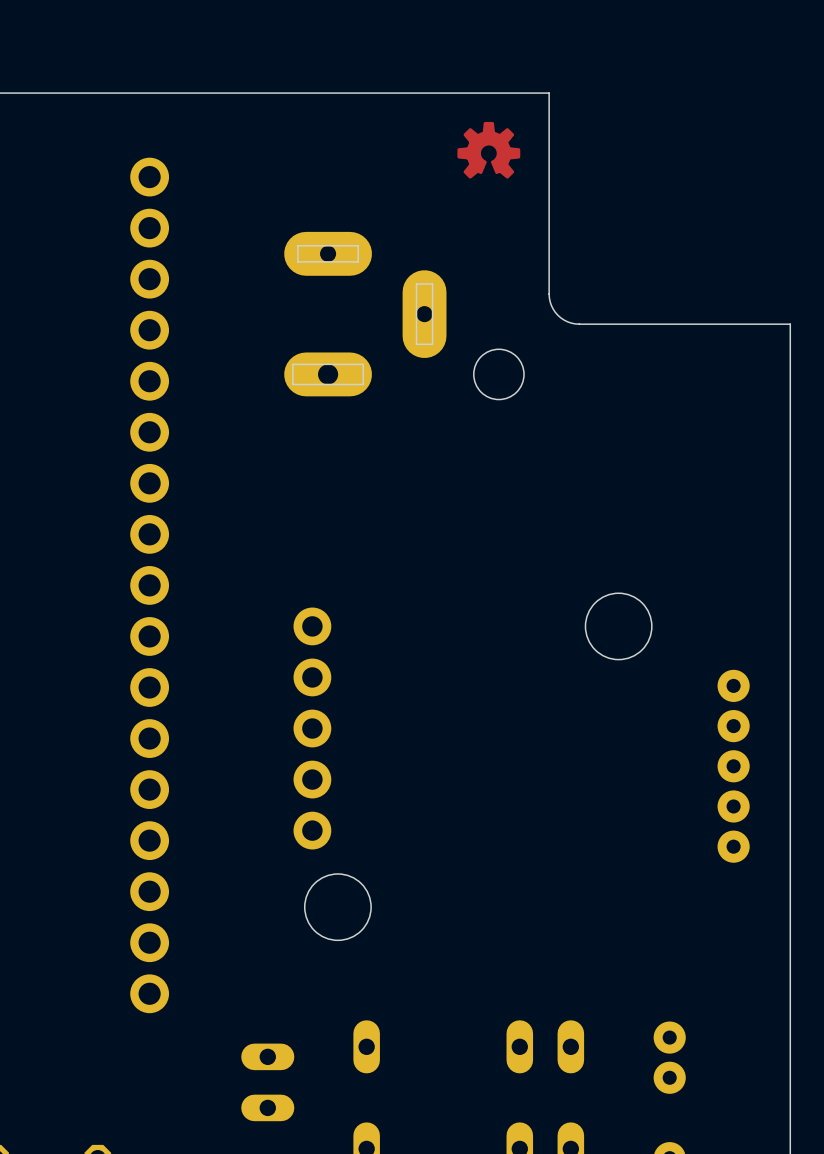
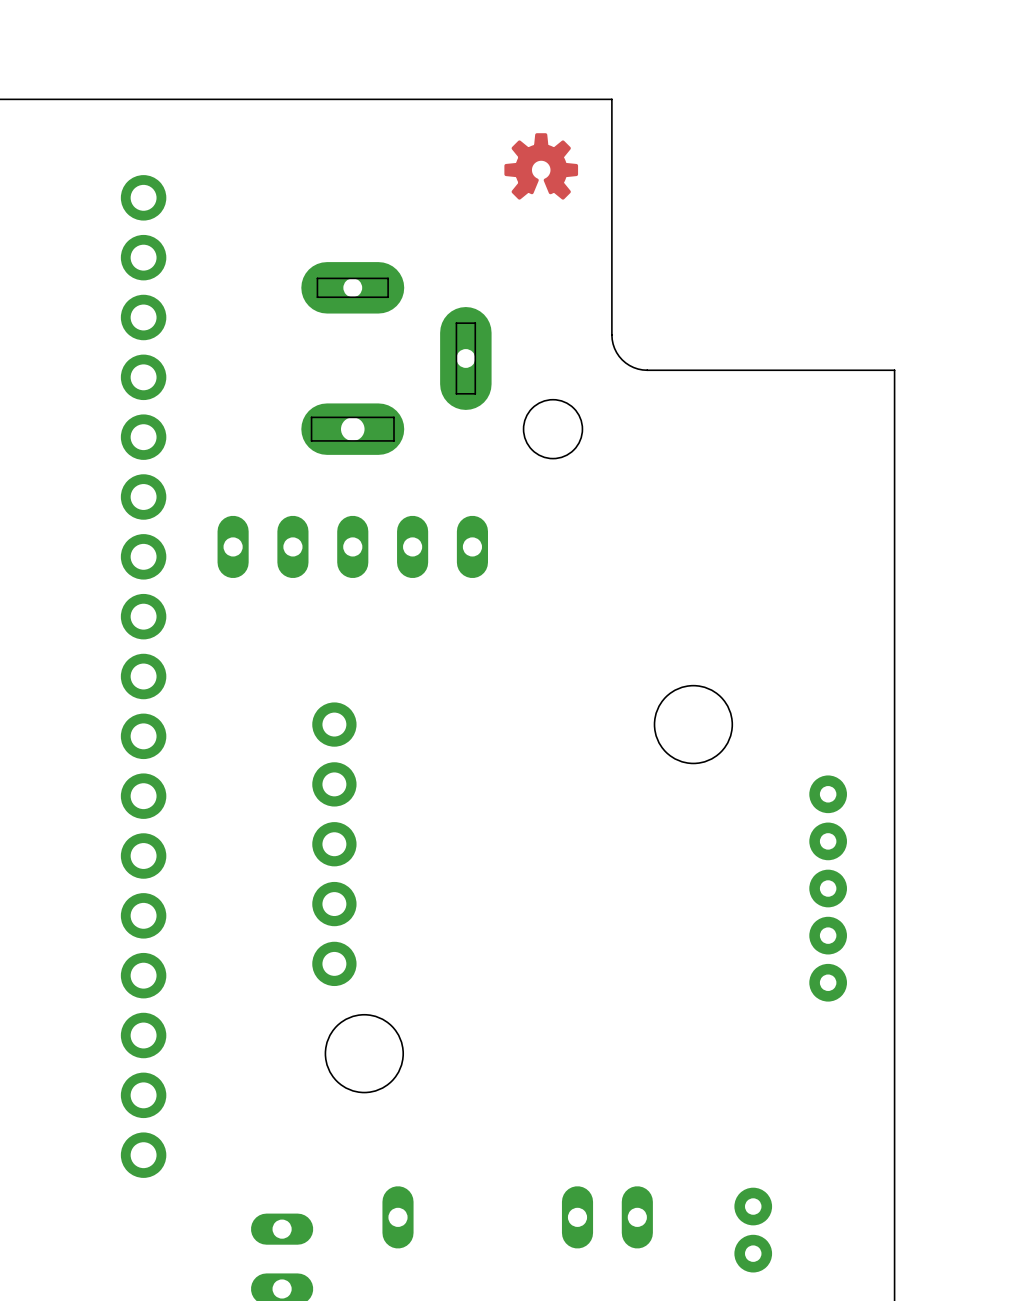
part: none -> (352, 546)

